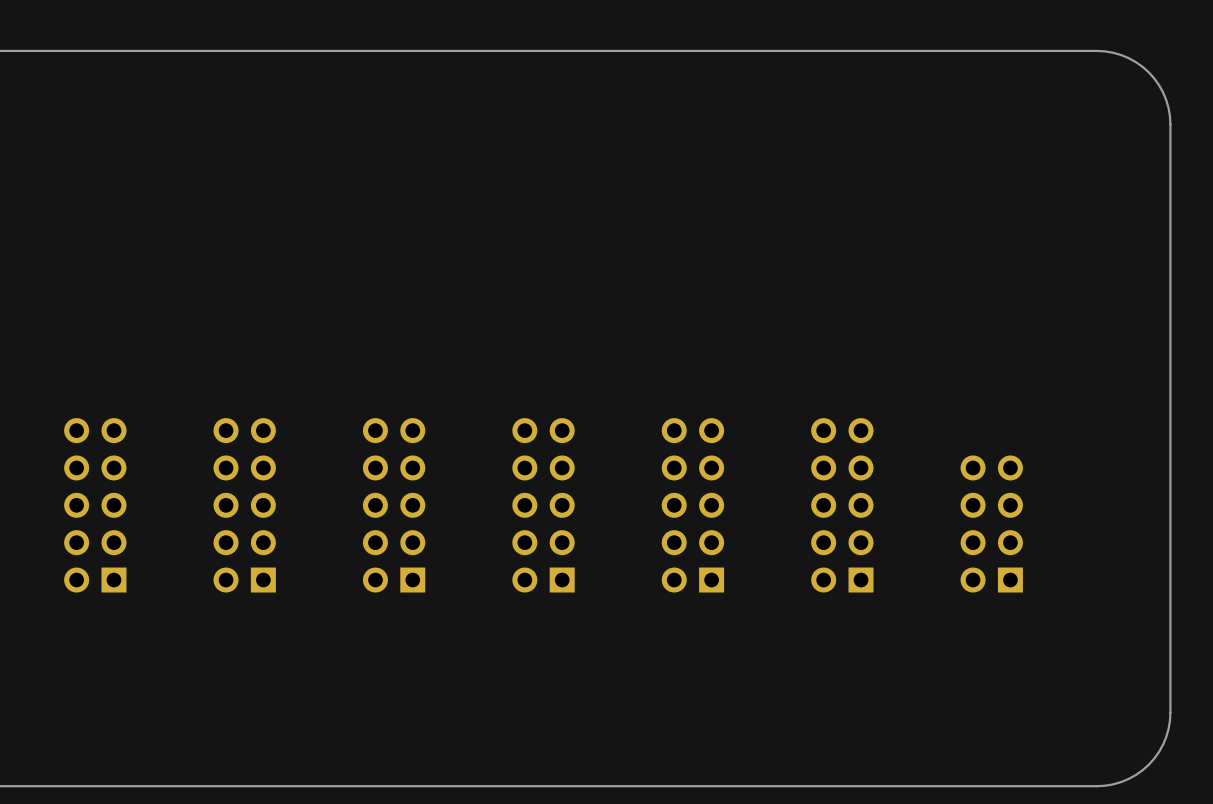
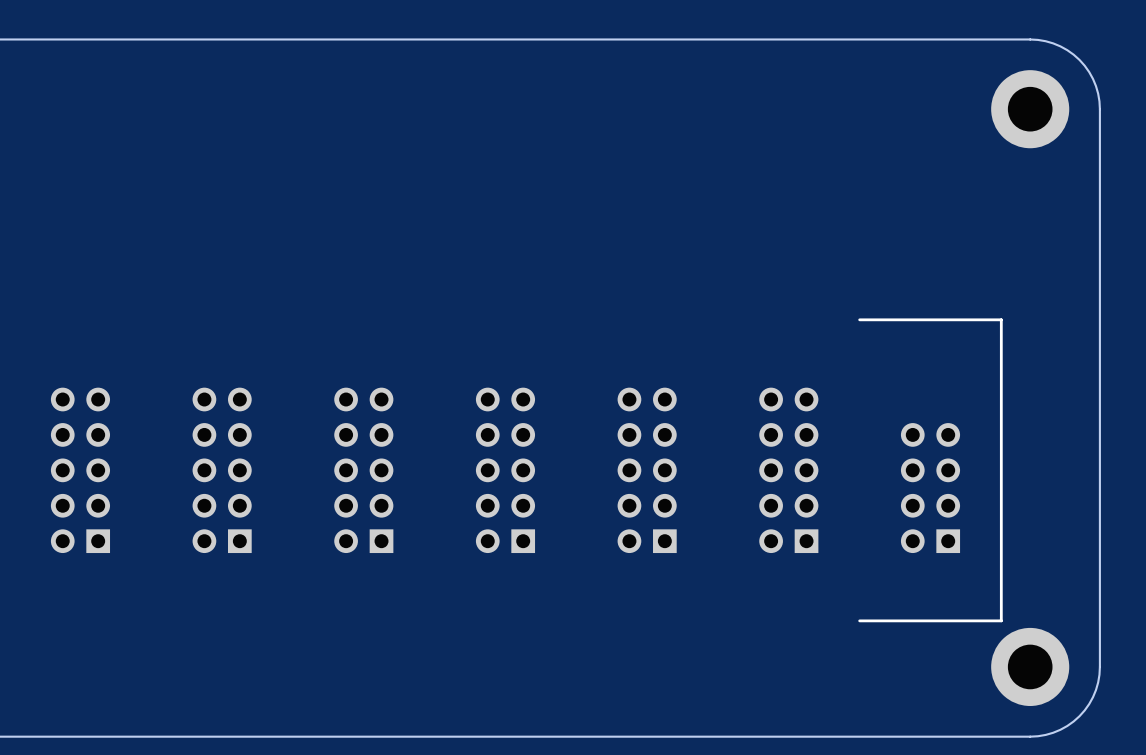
part: none -> (1030, 109)
line: none -> (859, 319) (1001, 319) (1001, 620) (859, 620)
part: none -> (1030, 666)

